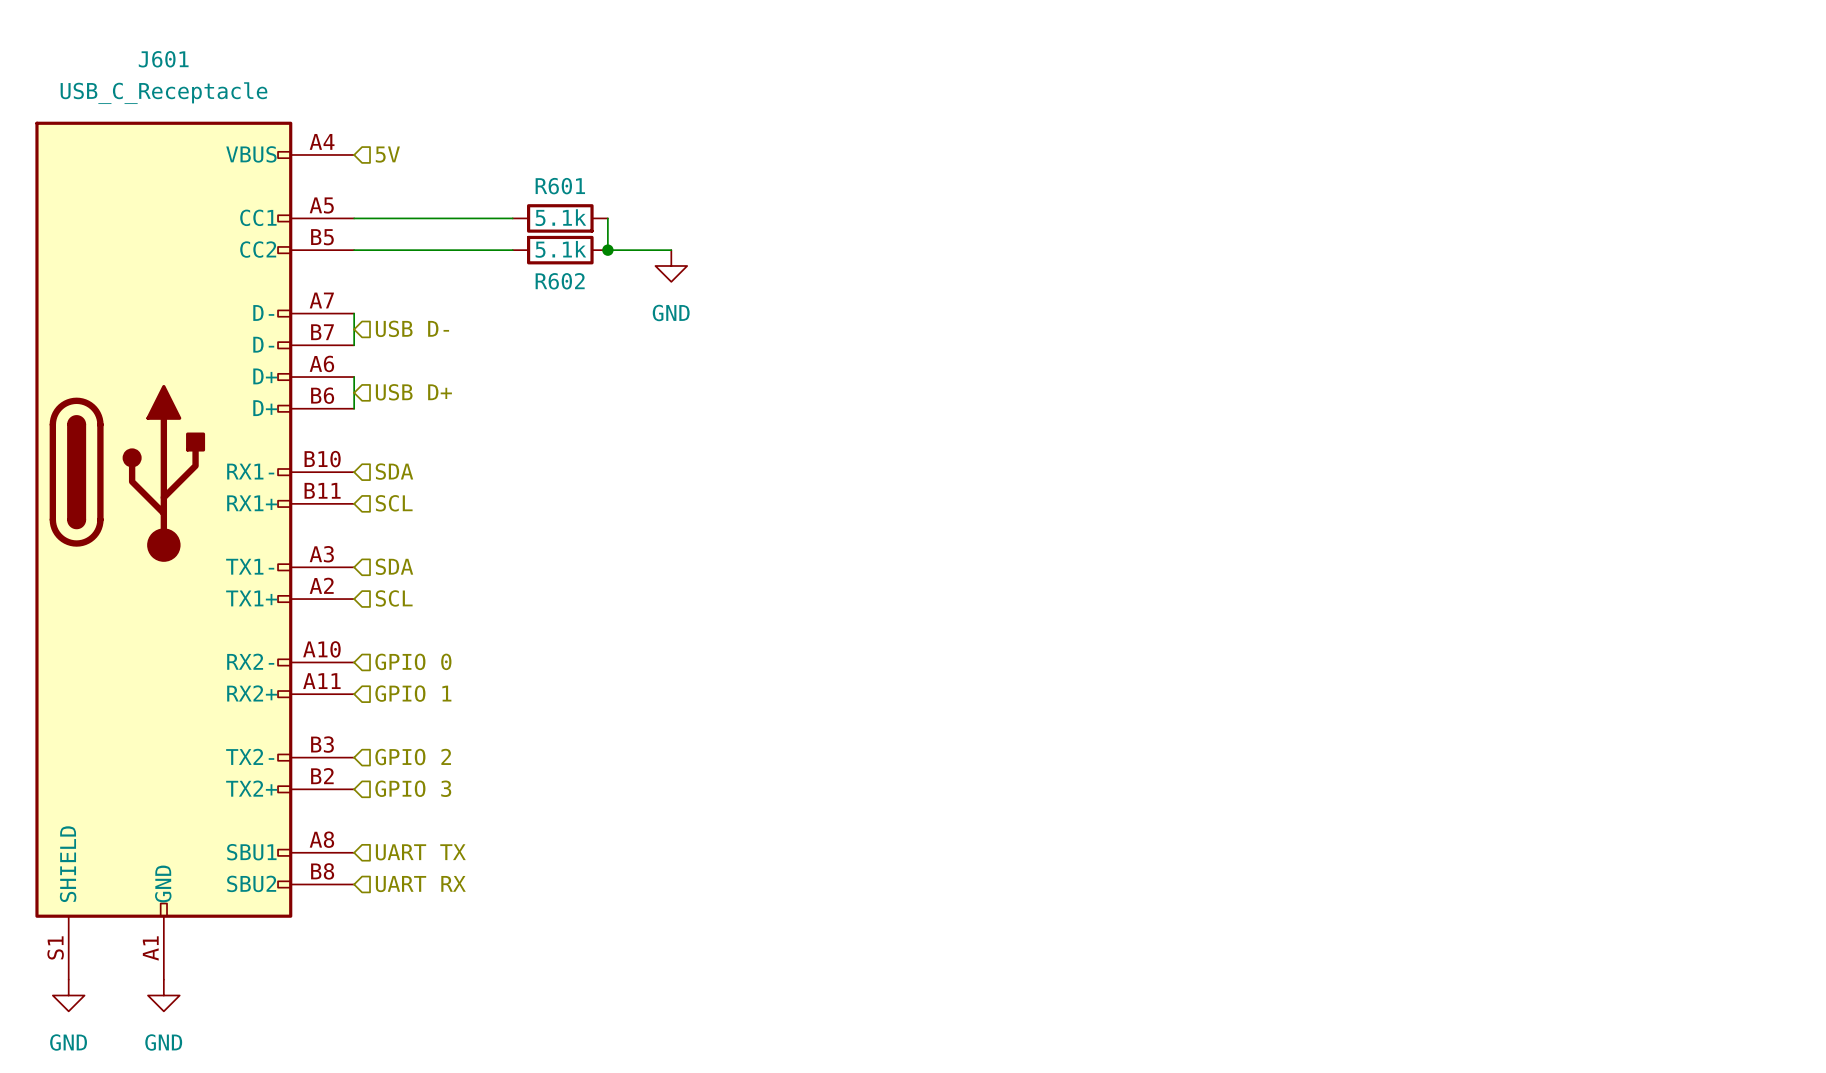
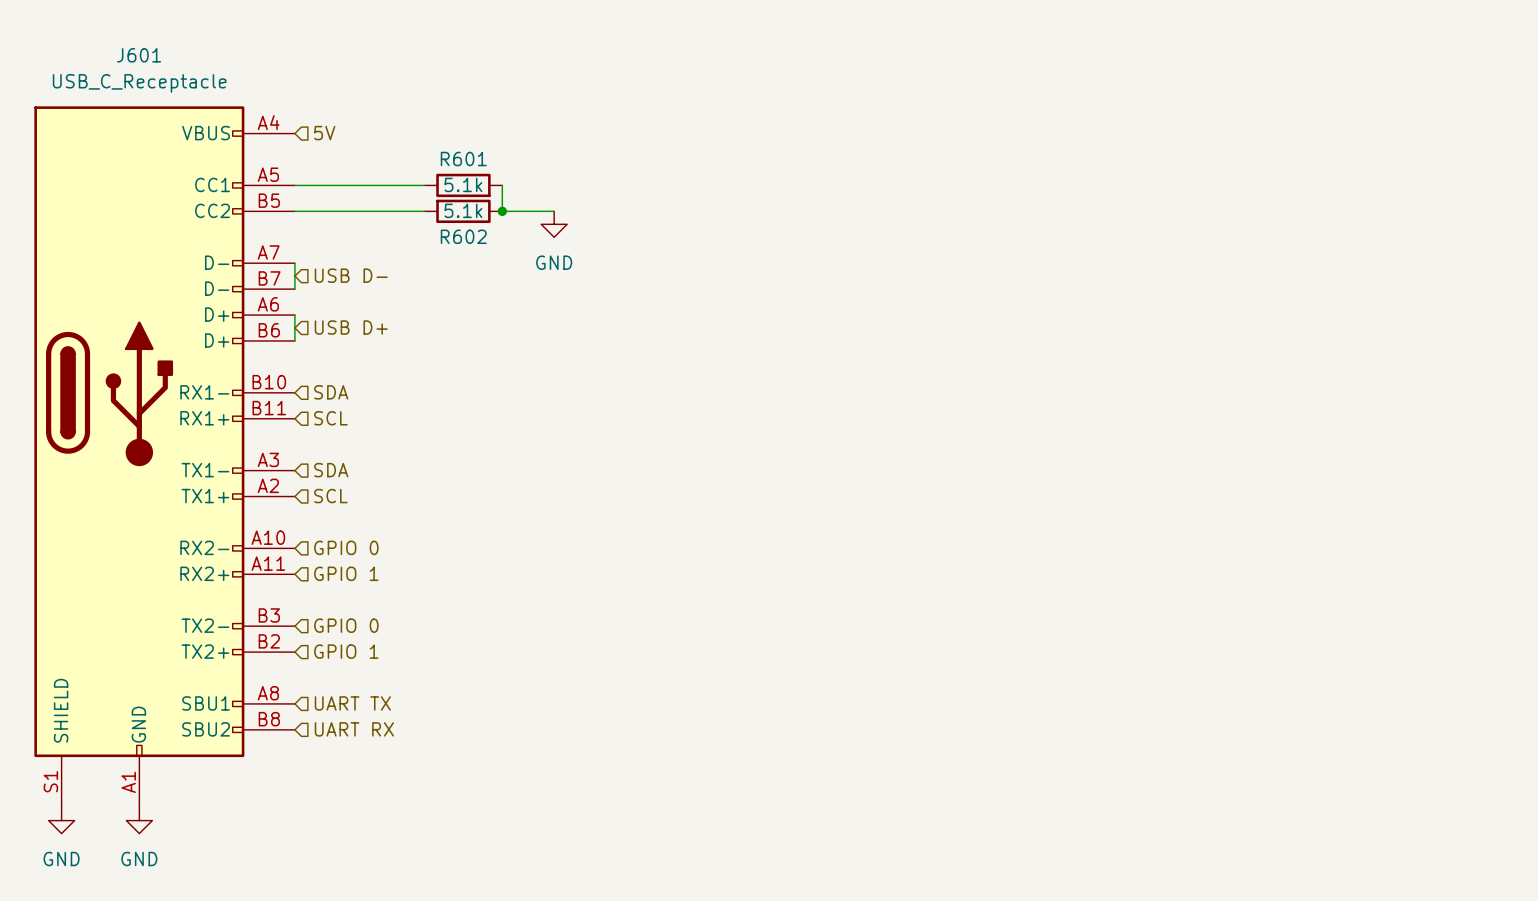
hierarchical label: GPIO 2 (413, 757) -> GPIO 0 (346, 625)
hierarchical label: GPIO 3 (413, 788) -> GPIO 1 (346, 651)

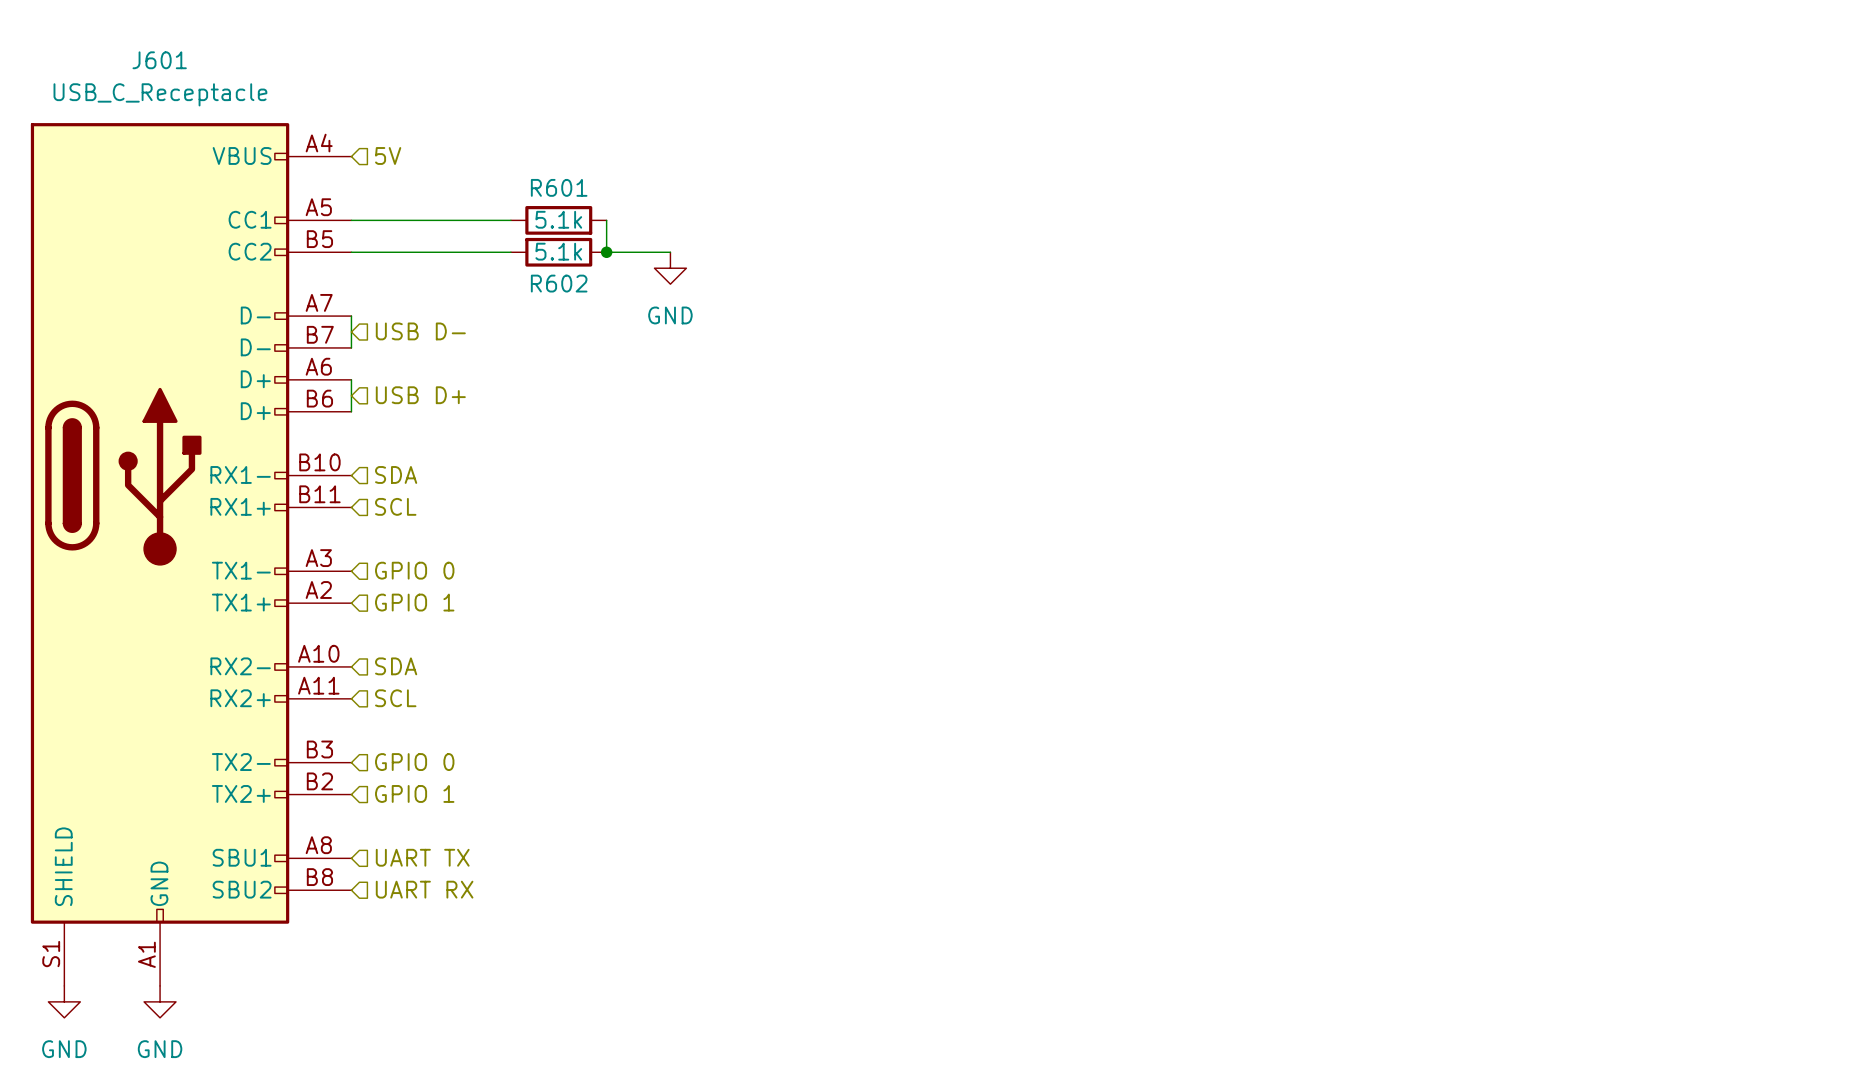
hierarchical label: SDA (331, 470) -> GPIO 0 (414, 570)
hierarchical label: SCL (330, 496) -> GPIO 1 (414, 602)
hierarchical label: GPIO 0 (346, 547) -> SDA (396, 666)
hierarchical label: GPIO 1 (346, 573) -> SCL (395, 698)

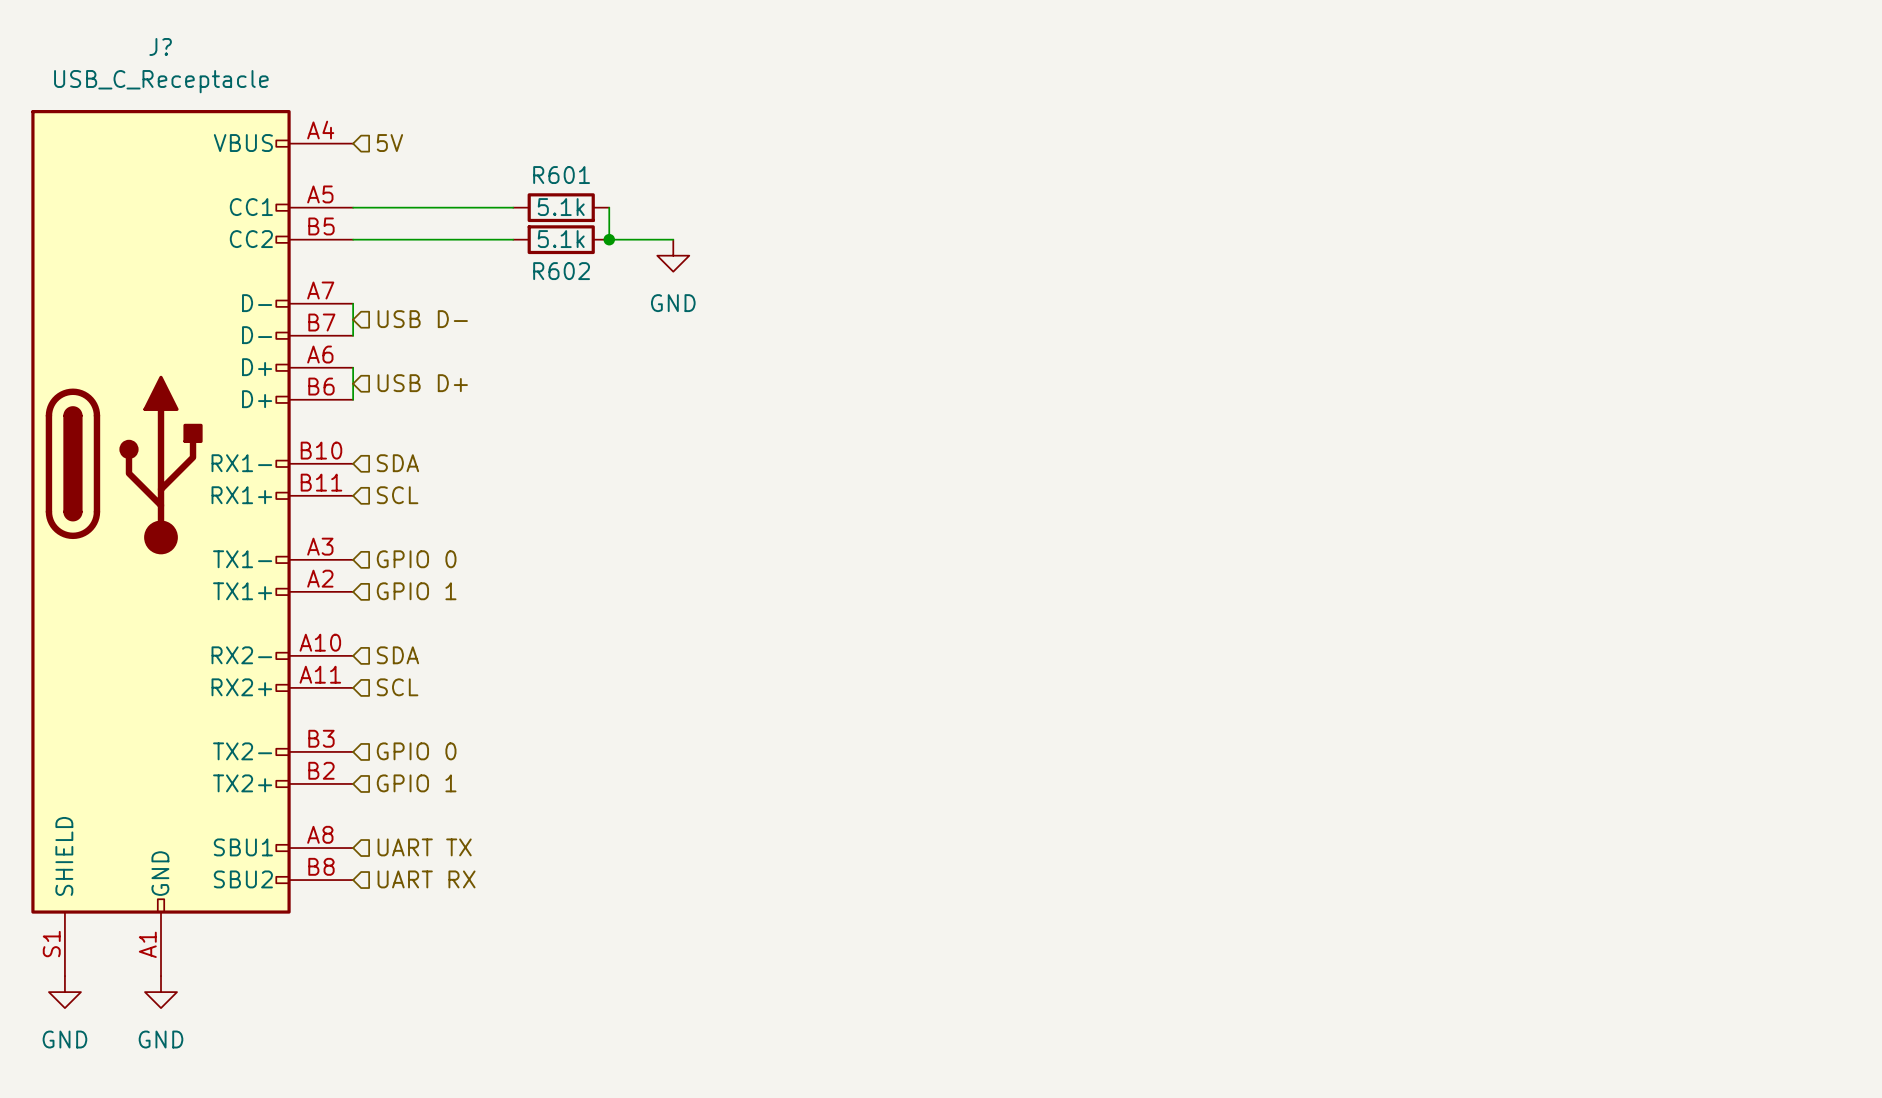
J601 name: J601 (159, 60) -> J? (160, 46)

